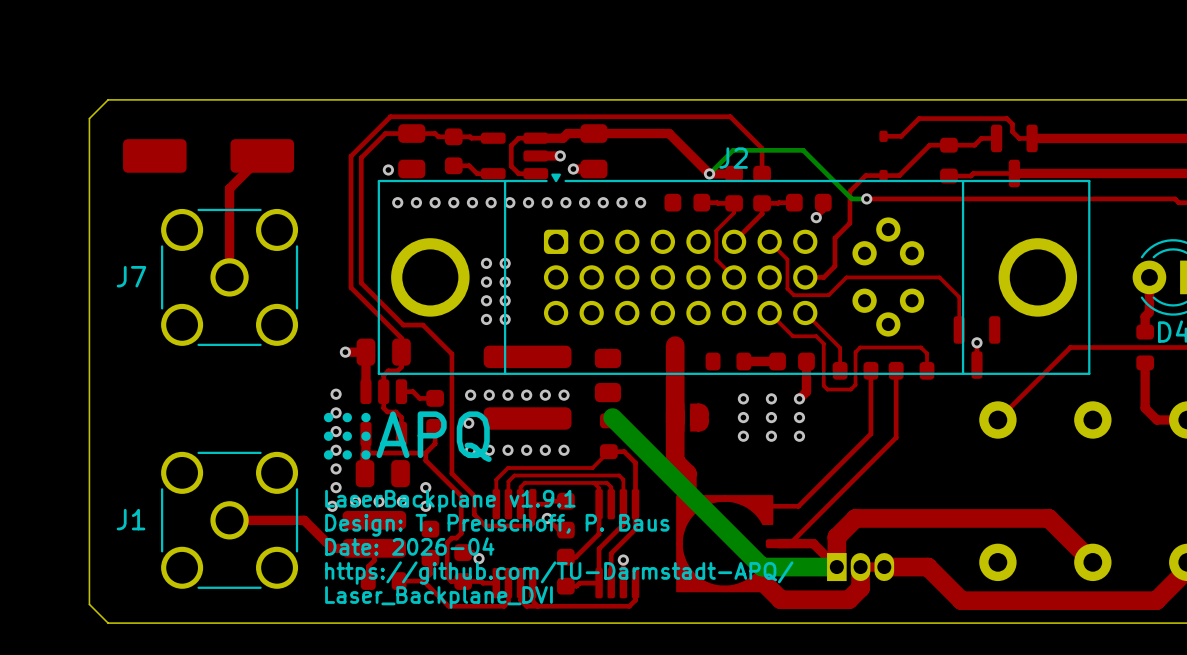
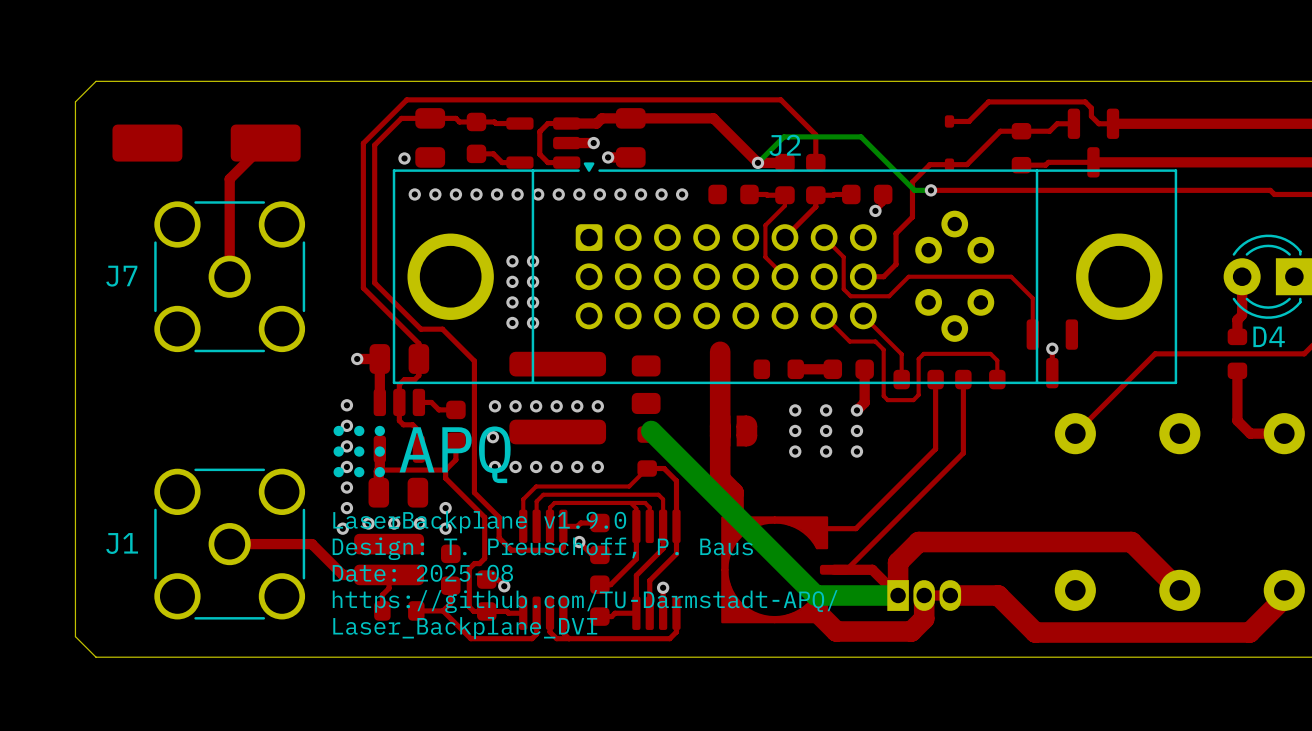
text: LaserBackplane v1.9.1 (450, 501) -> LaserBackplane v1.9.0 (479, 522)
text: Date: 2026-04 (409, 546) -> Date: 2025-08 (422, 573)

